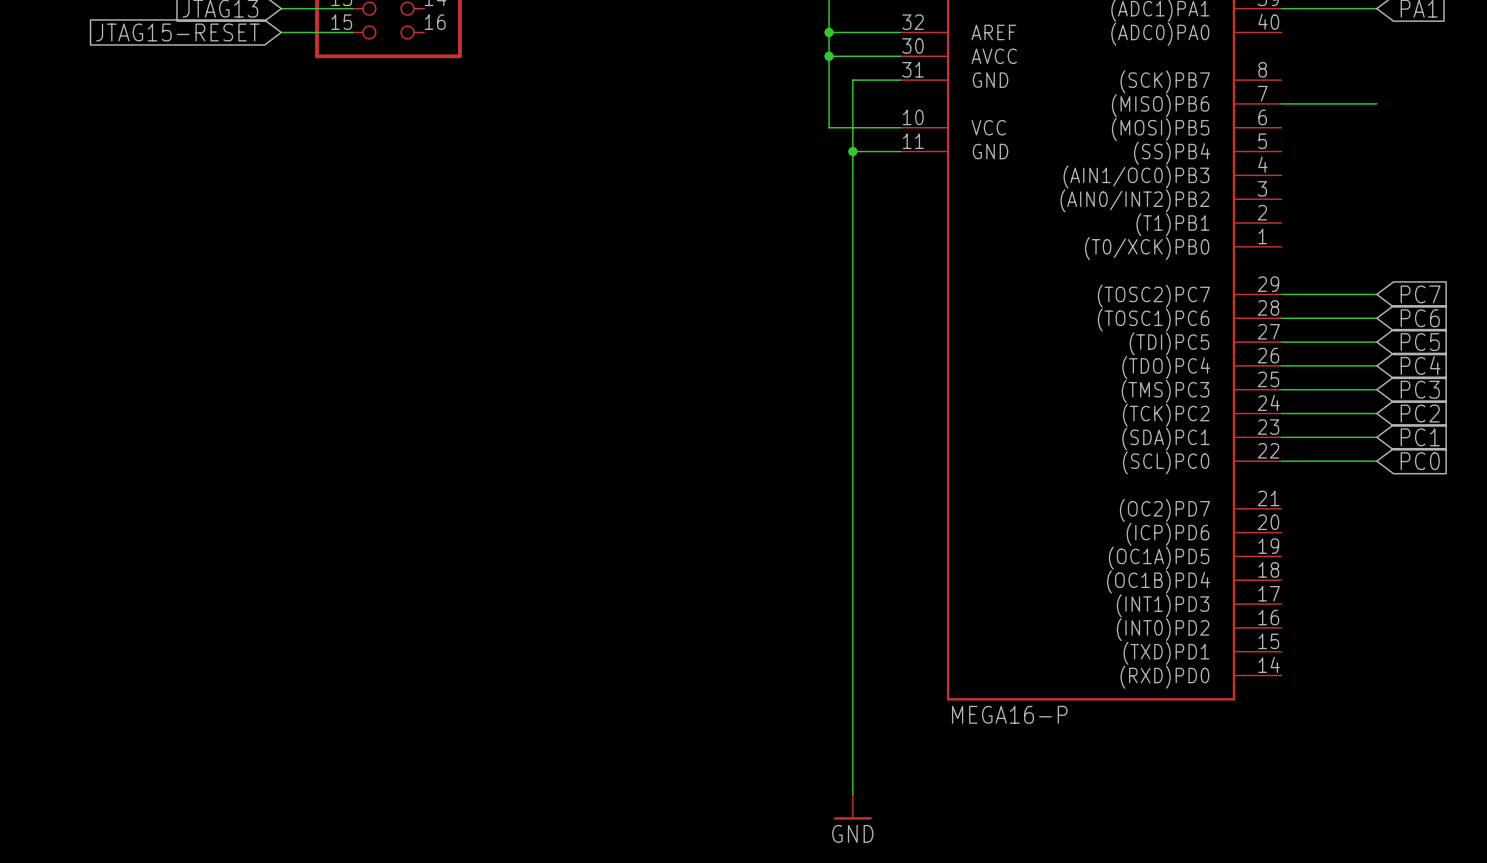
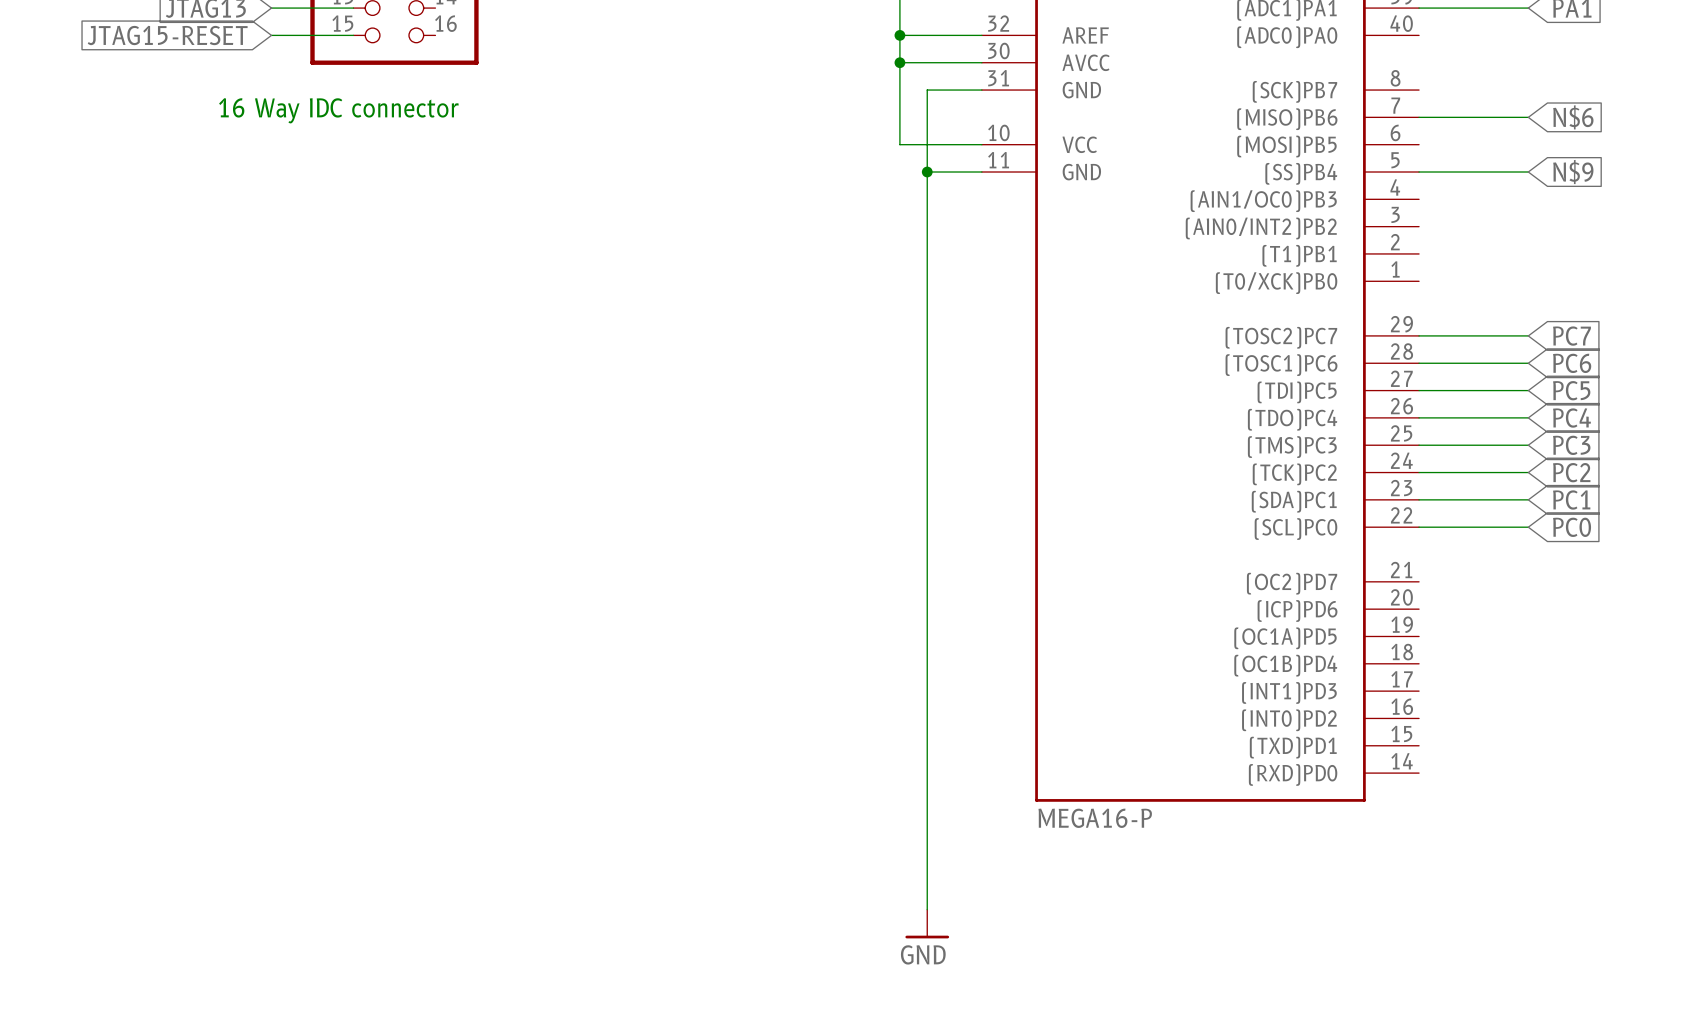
text: none -> 16 Way IDC connector (338, 110)
global label: none -> N$6 (1573, 117)
wire: none -> (1419, 172) (1528, 172)
global label: none -> N$9 (1573, 172)

